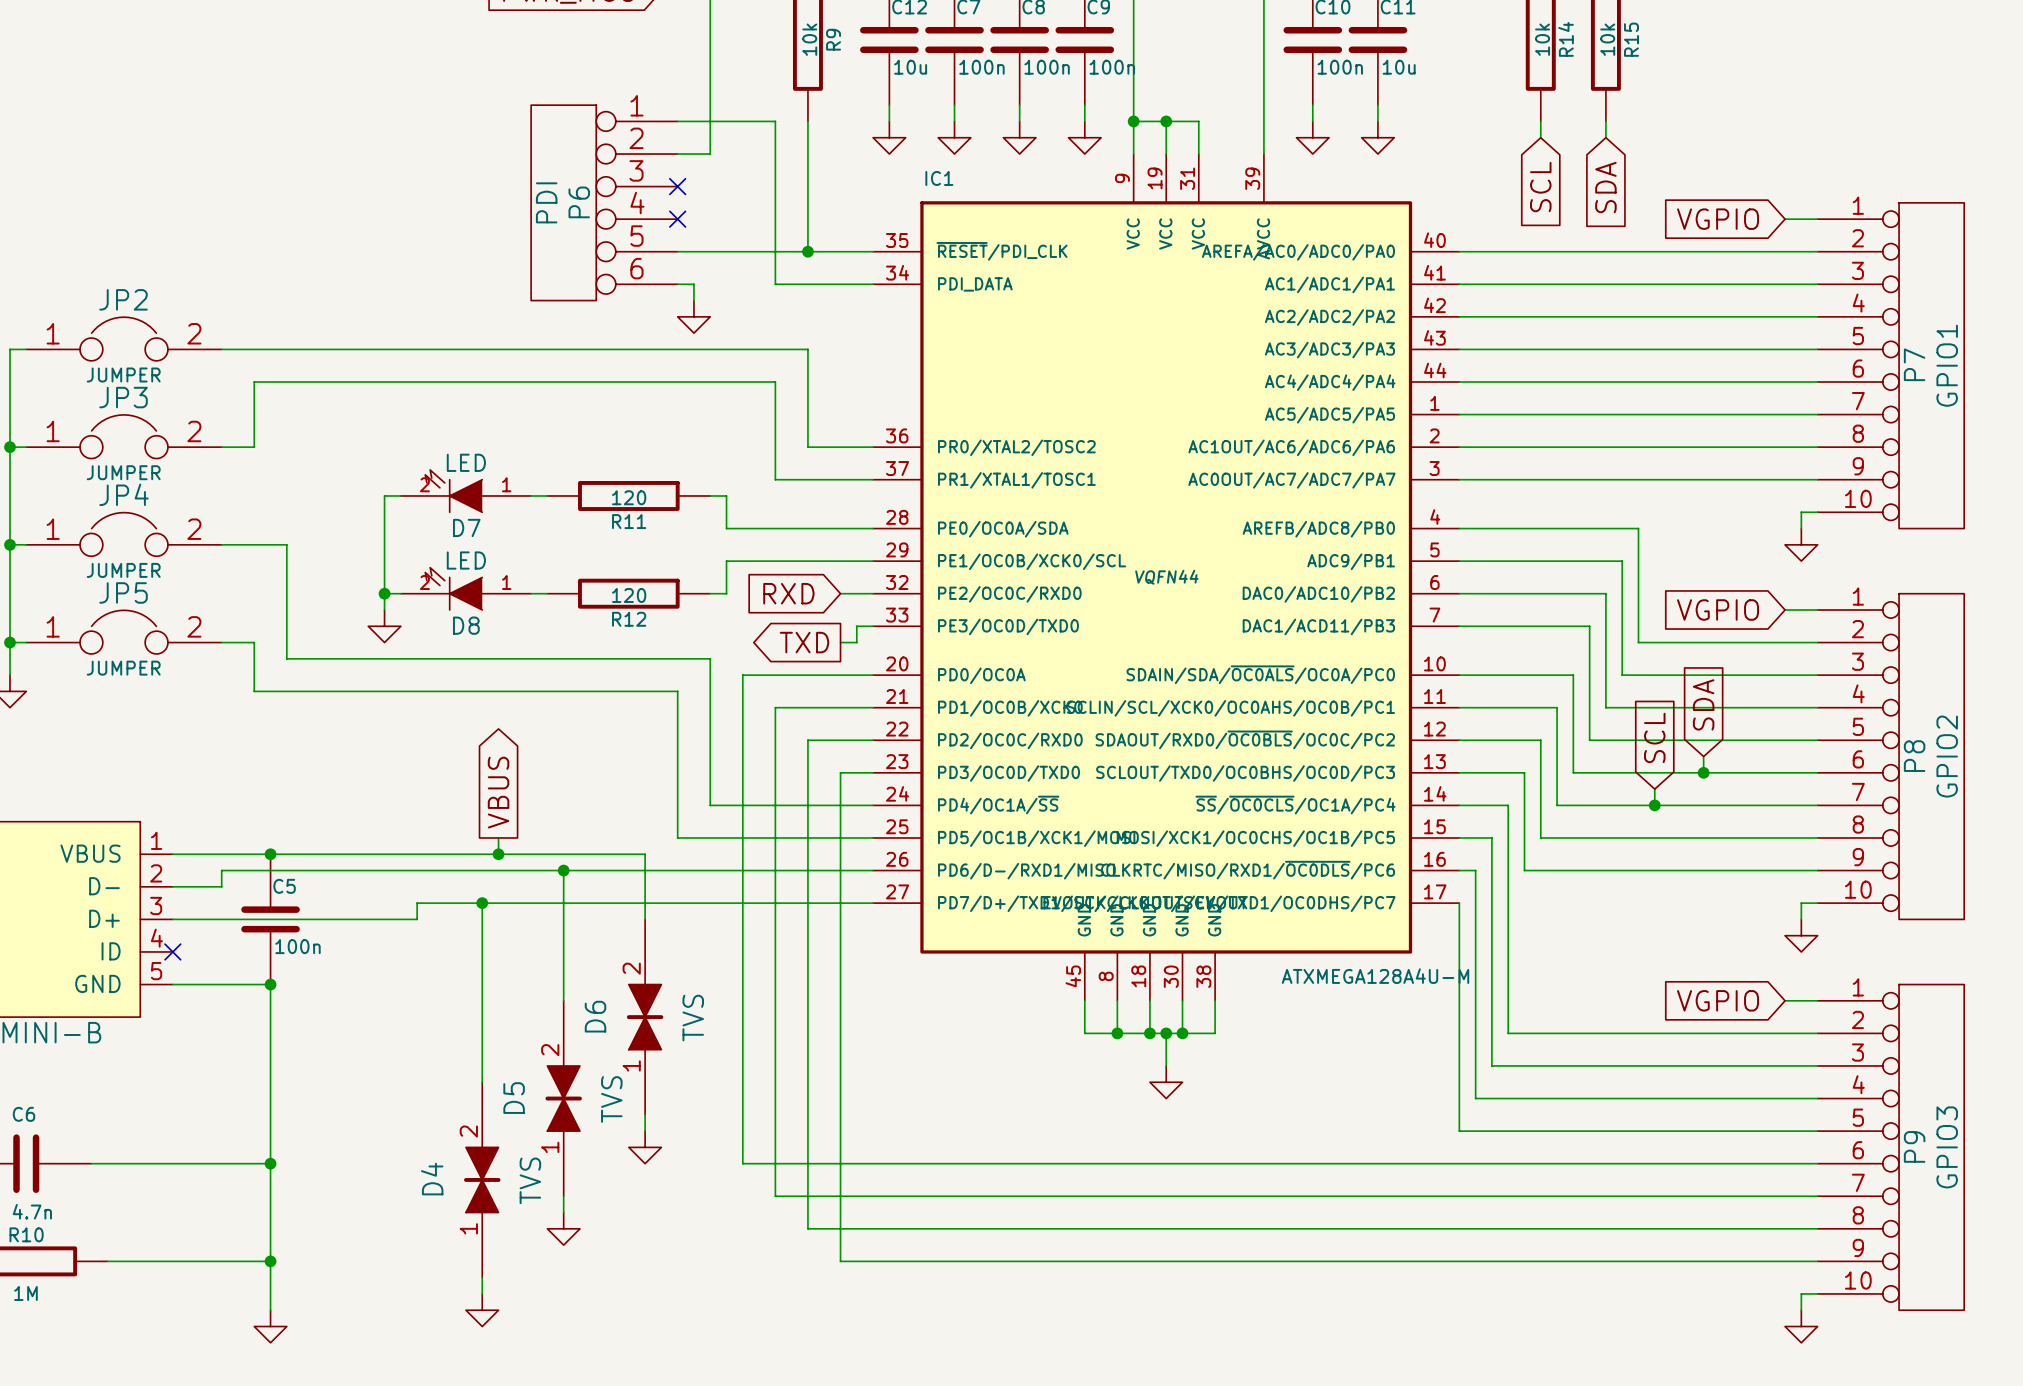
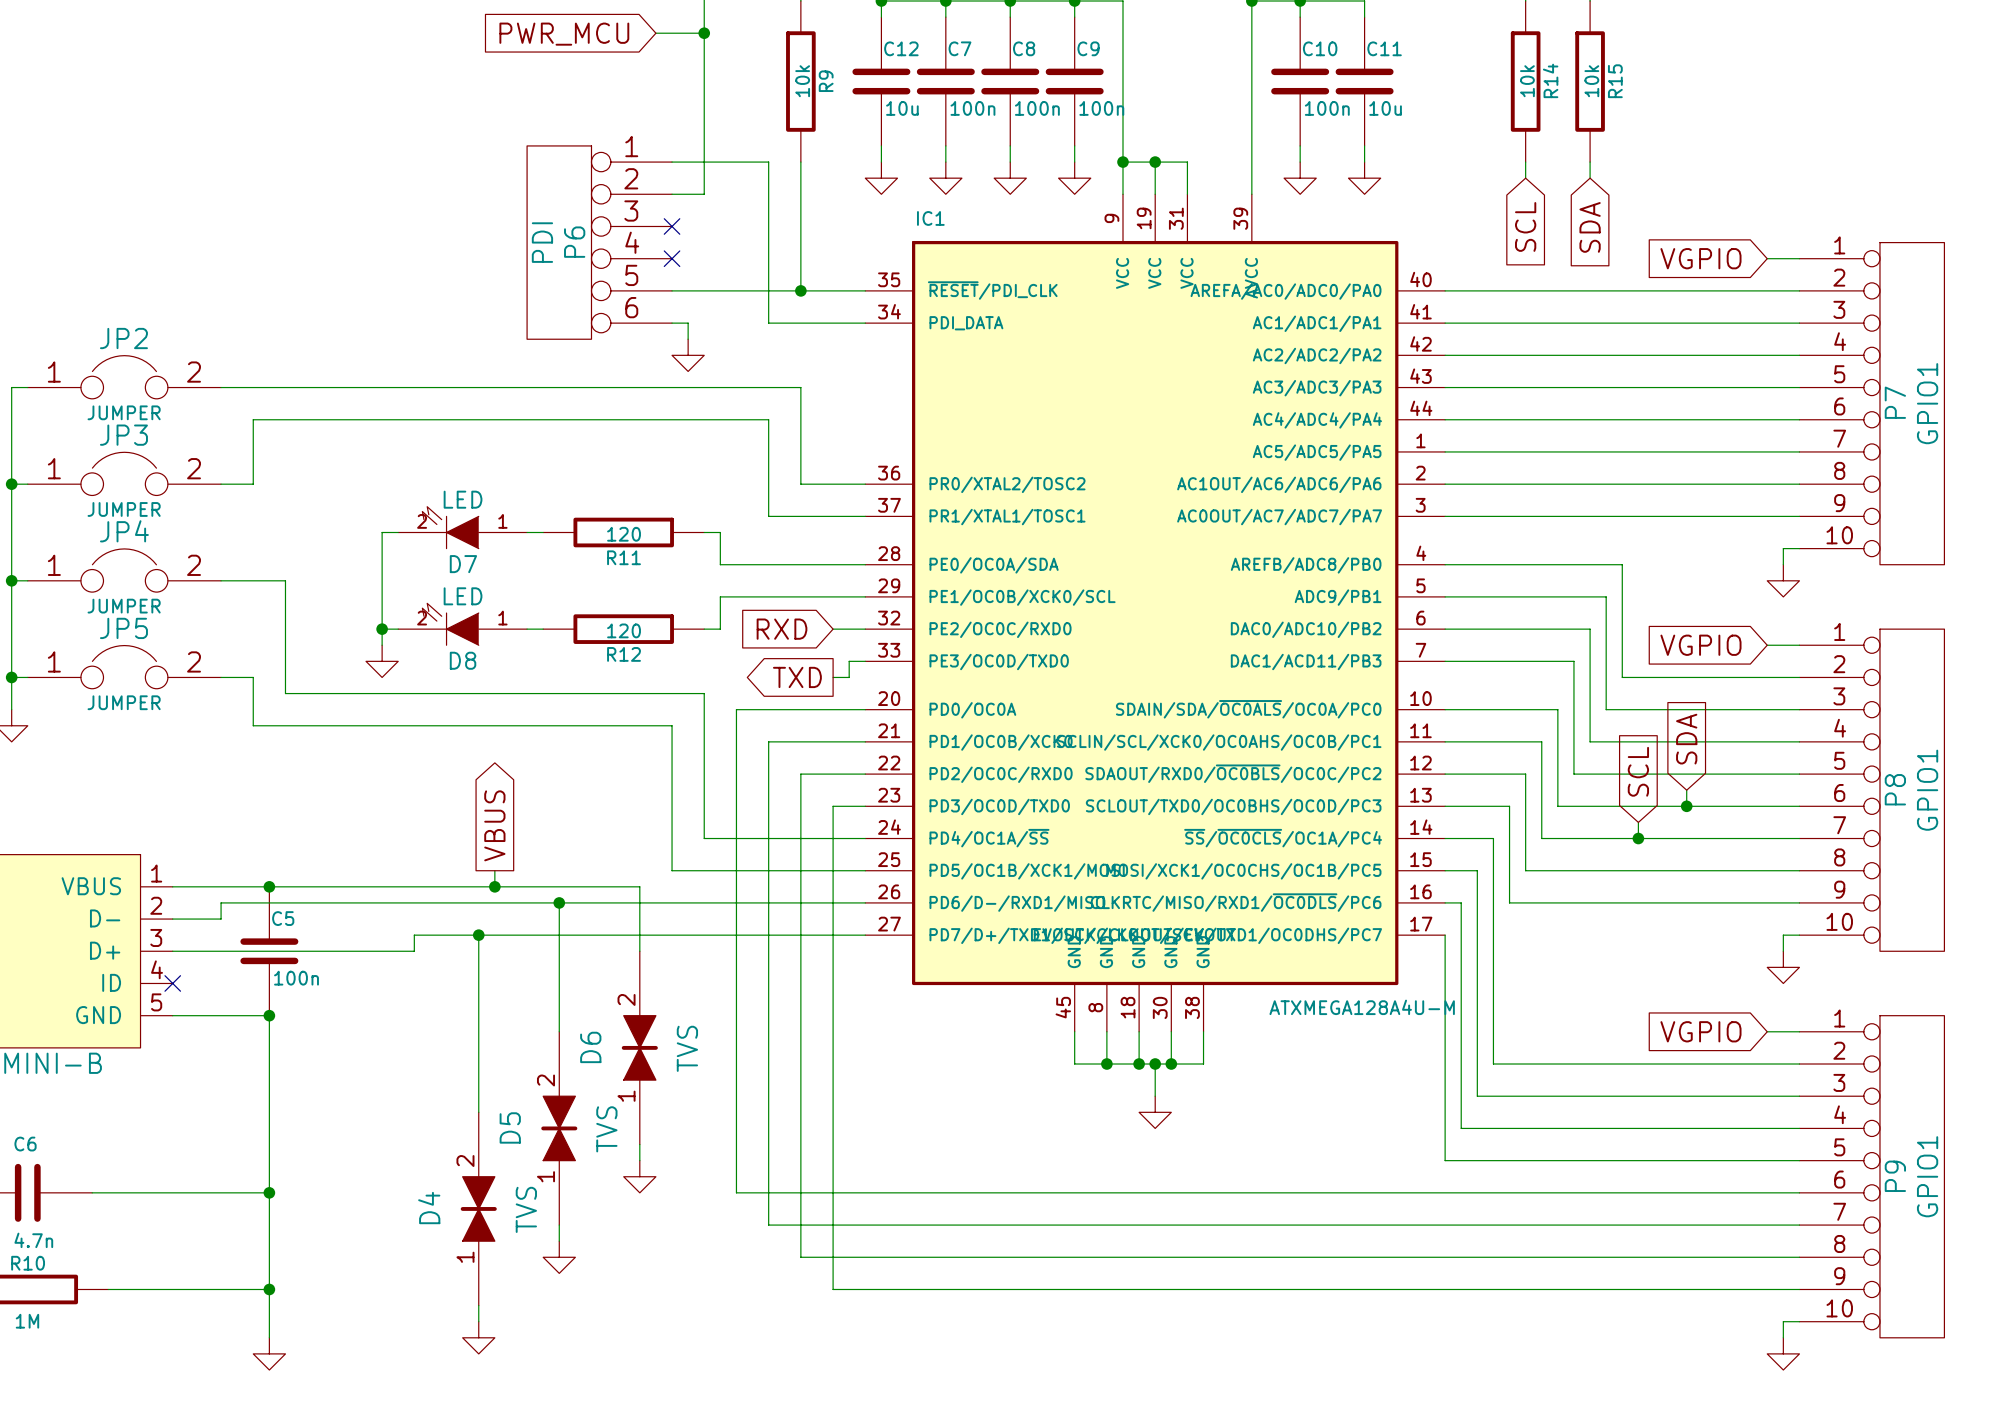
IC1 text: VQFN44 (1166, 577) -> none
P8 value: GPIO2 (1947, 756) -> GPIO1 (1927, 790)
P9 value: GPIO3 (1947, 1147) -> GPIO1 (1927, 1176)

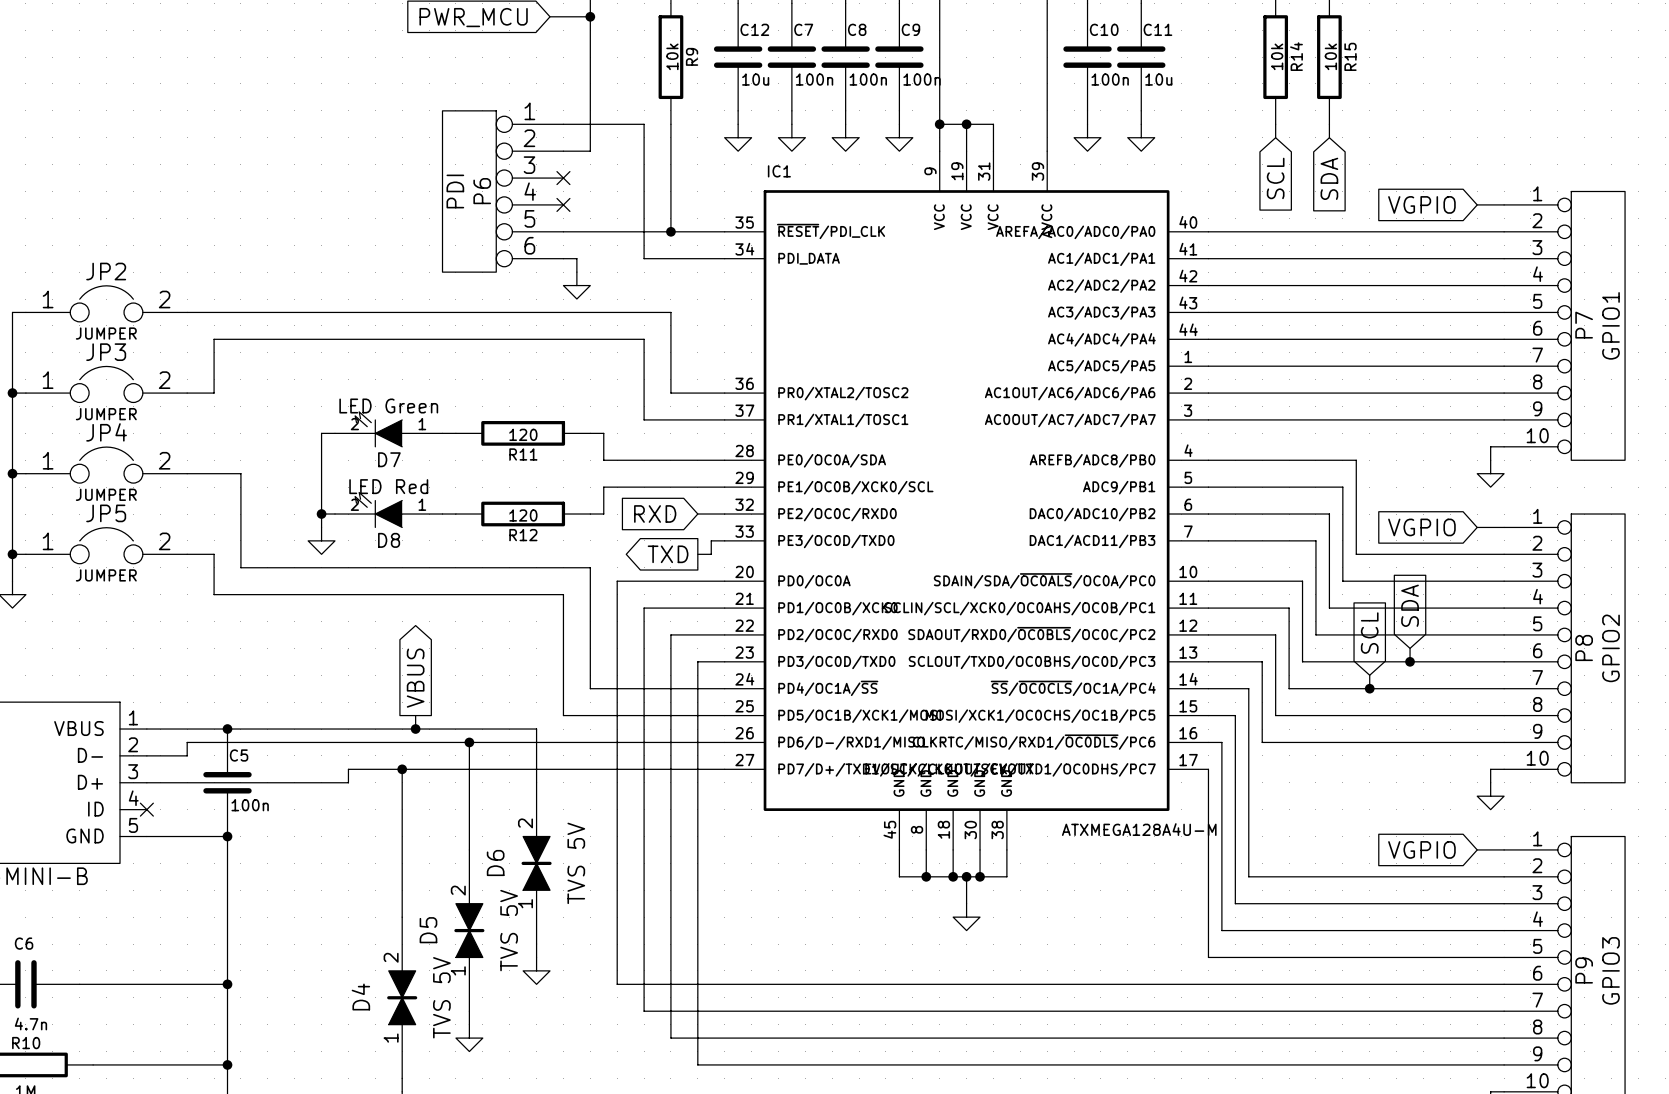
D7 value: LED (463, 499) -> LED Green (388, 406)
D8 value: LED (463, 596) -> LED Red (388, 486)
P8 value: GPIO1 (1927, 790) -> GPIO2 (1611, 648)
D6 value: TVS (687, 1048) -> TVS 5V (576, 863)
D5 value: TVS (606, 1129) -> TVS 5V (509, 930)
P9 value: GPIO1 (1927, 1176) -> GPIO3 (1611, 970)
D4 value: TVS (526, 1209) -> TVS 5V (441, 997)

